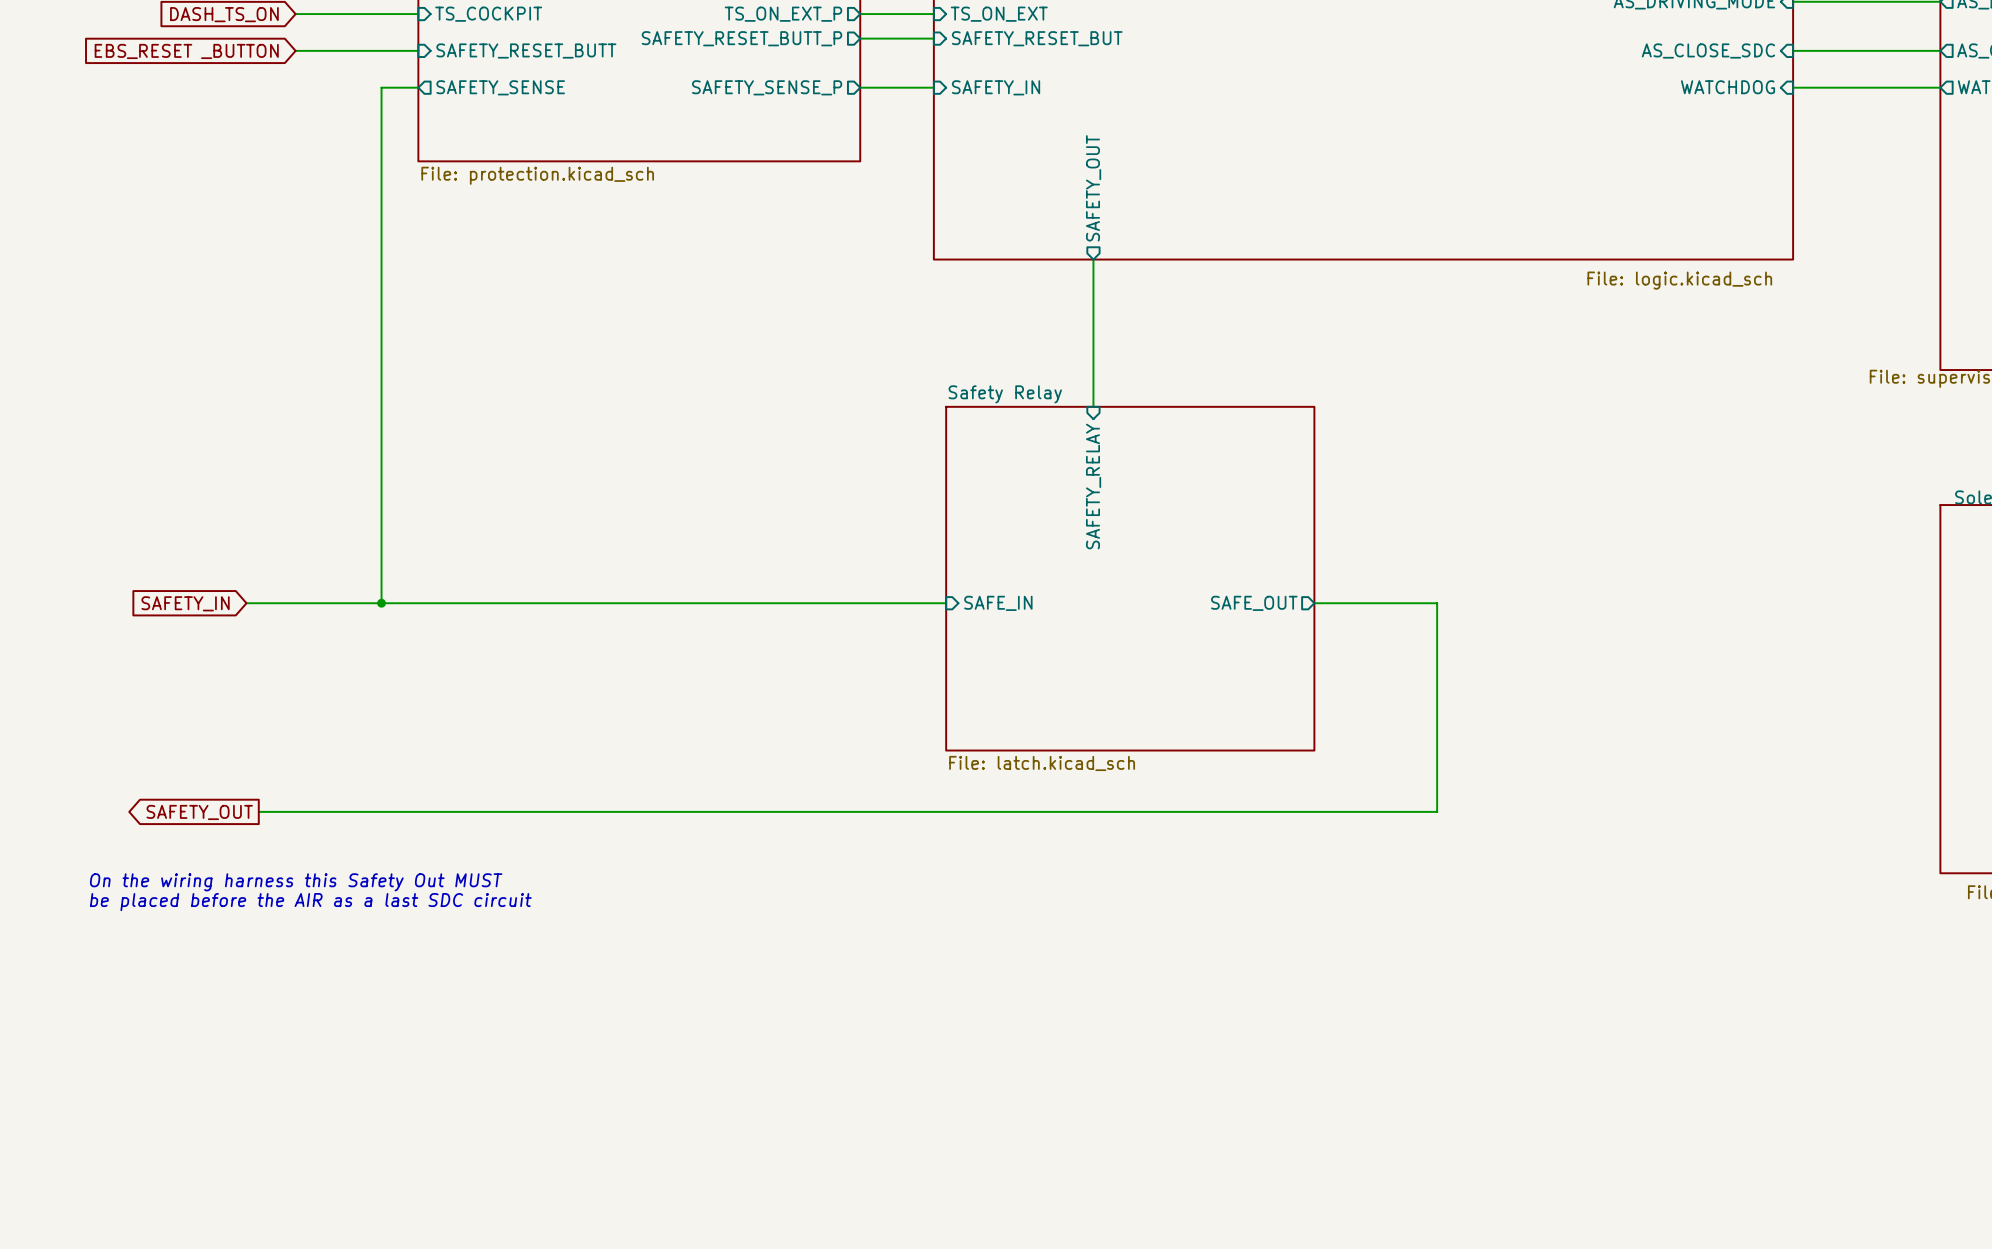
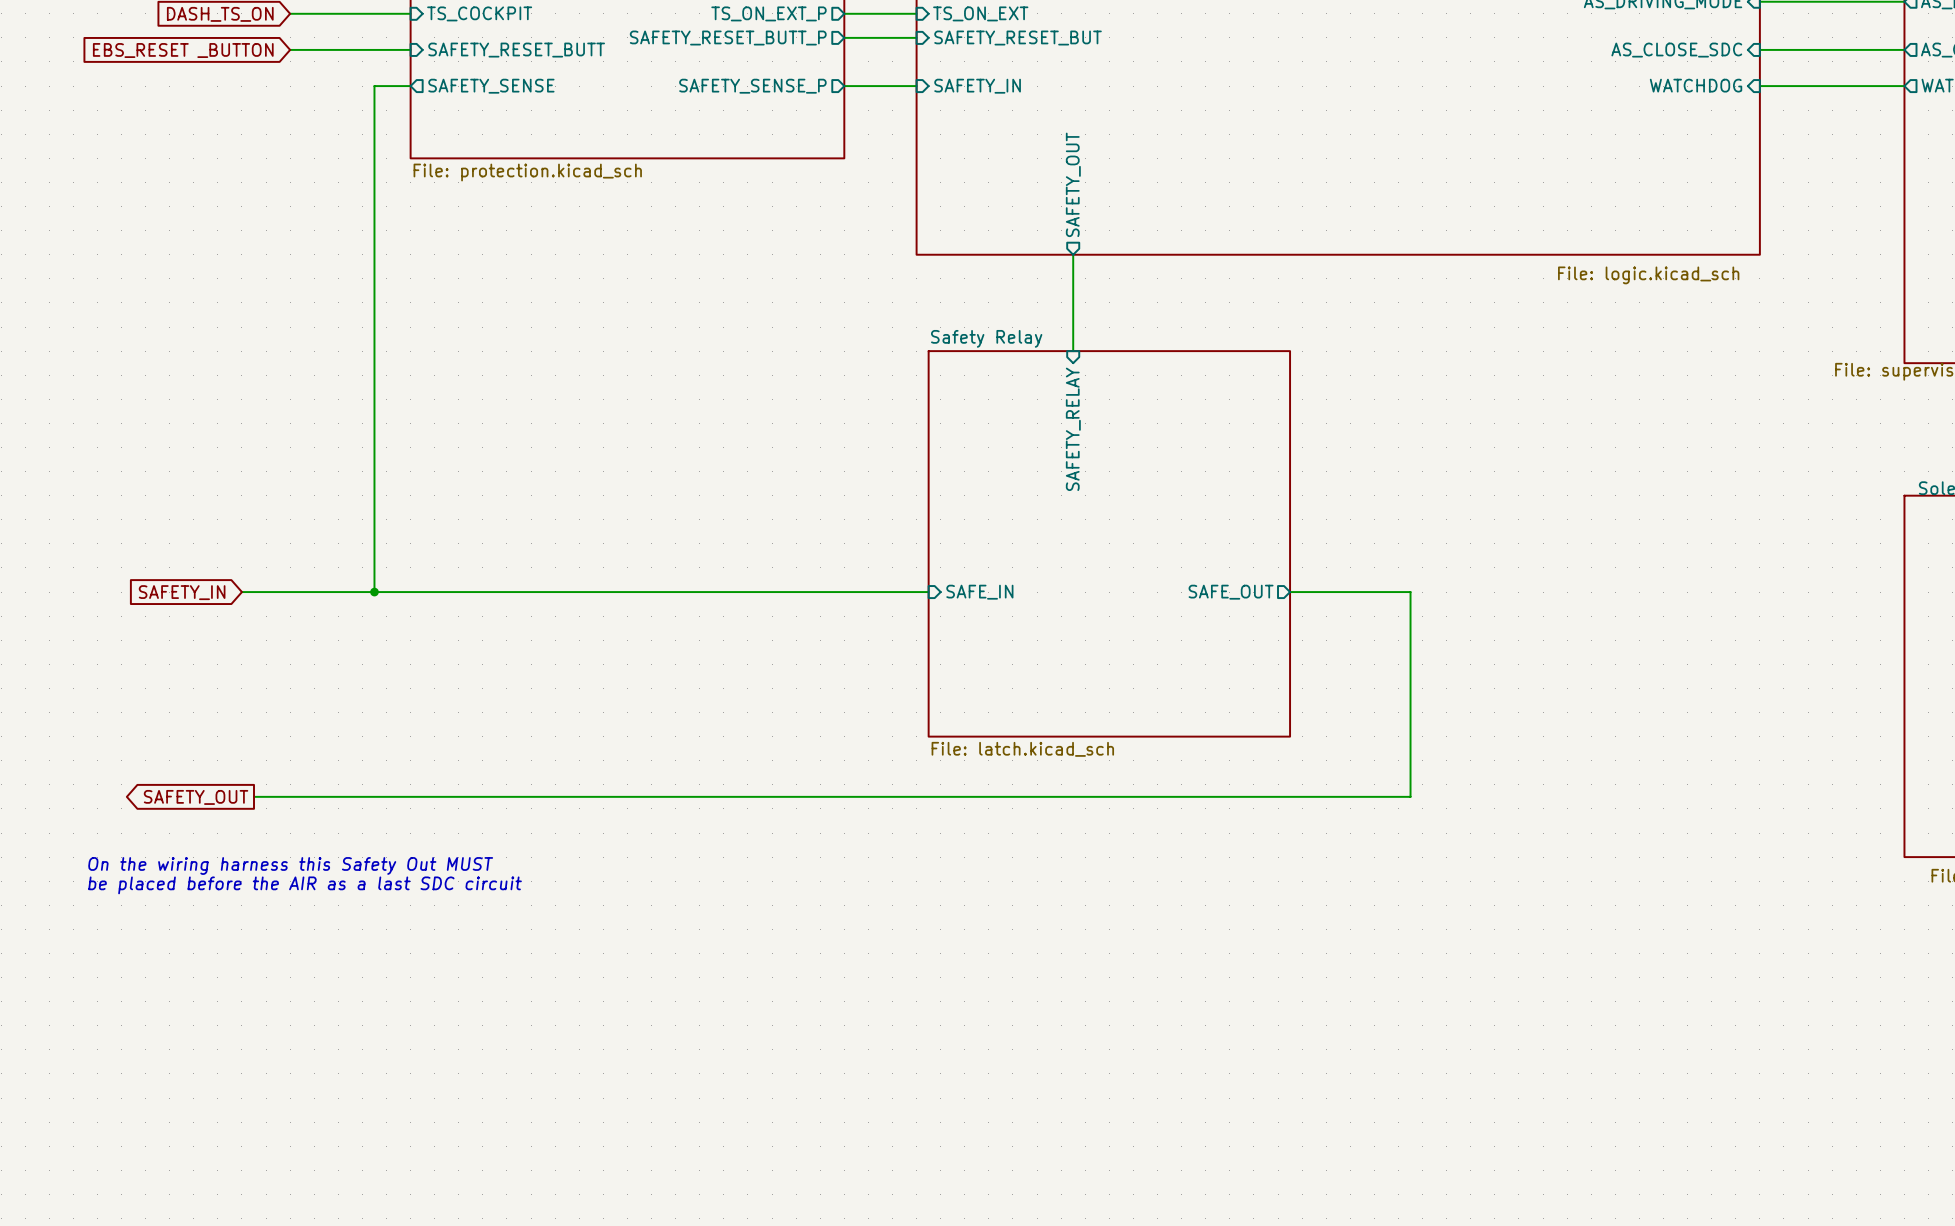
wire: (1093, 357) (1093, 406) -> none
sheet pin position: SAFETY_RELAY (1093, 486) -> SAFETY_RELAY (1073, 429)
sheet Safety Relay: none -> File: latch.kicad_sch (1109, 543)
sheet Safety Relay: File: latch.kicad_sch (1130, 578) -> none

